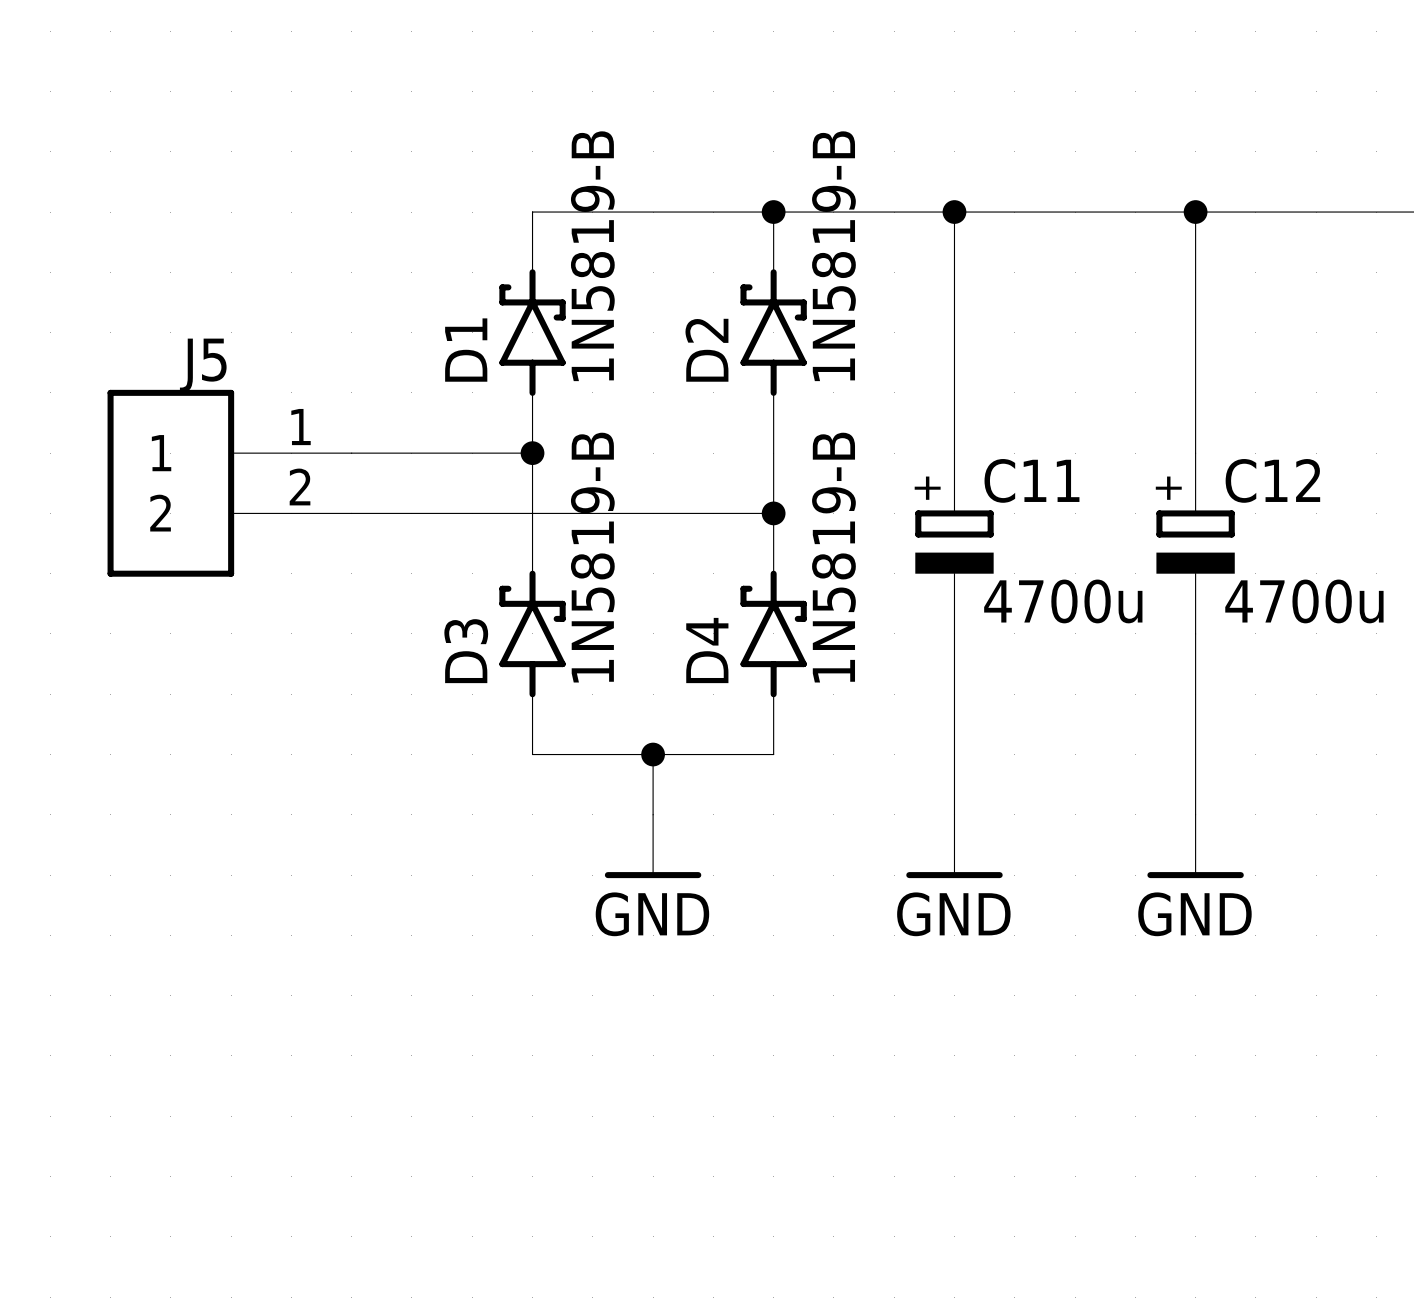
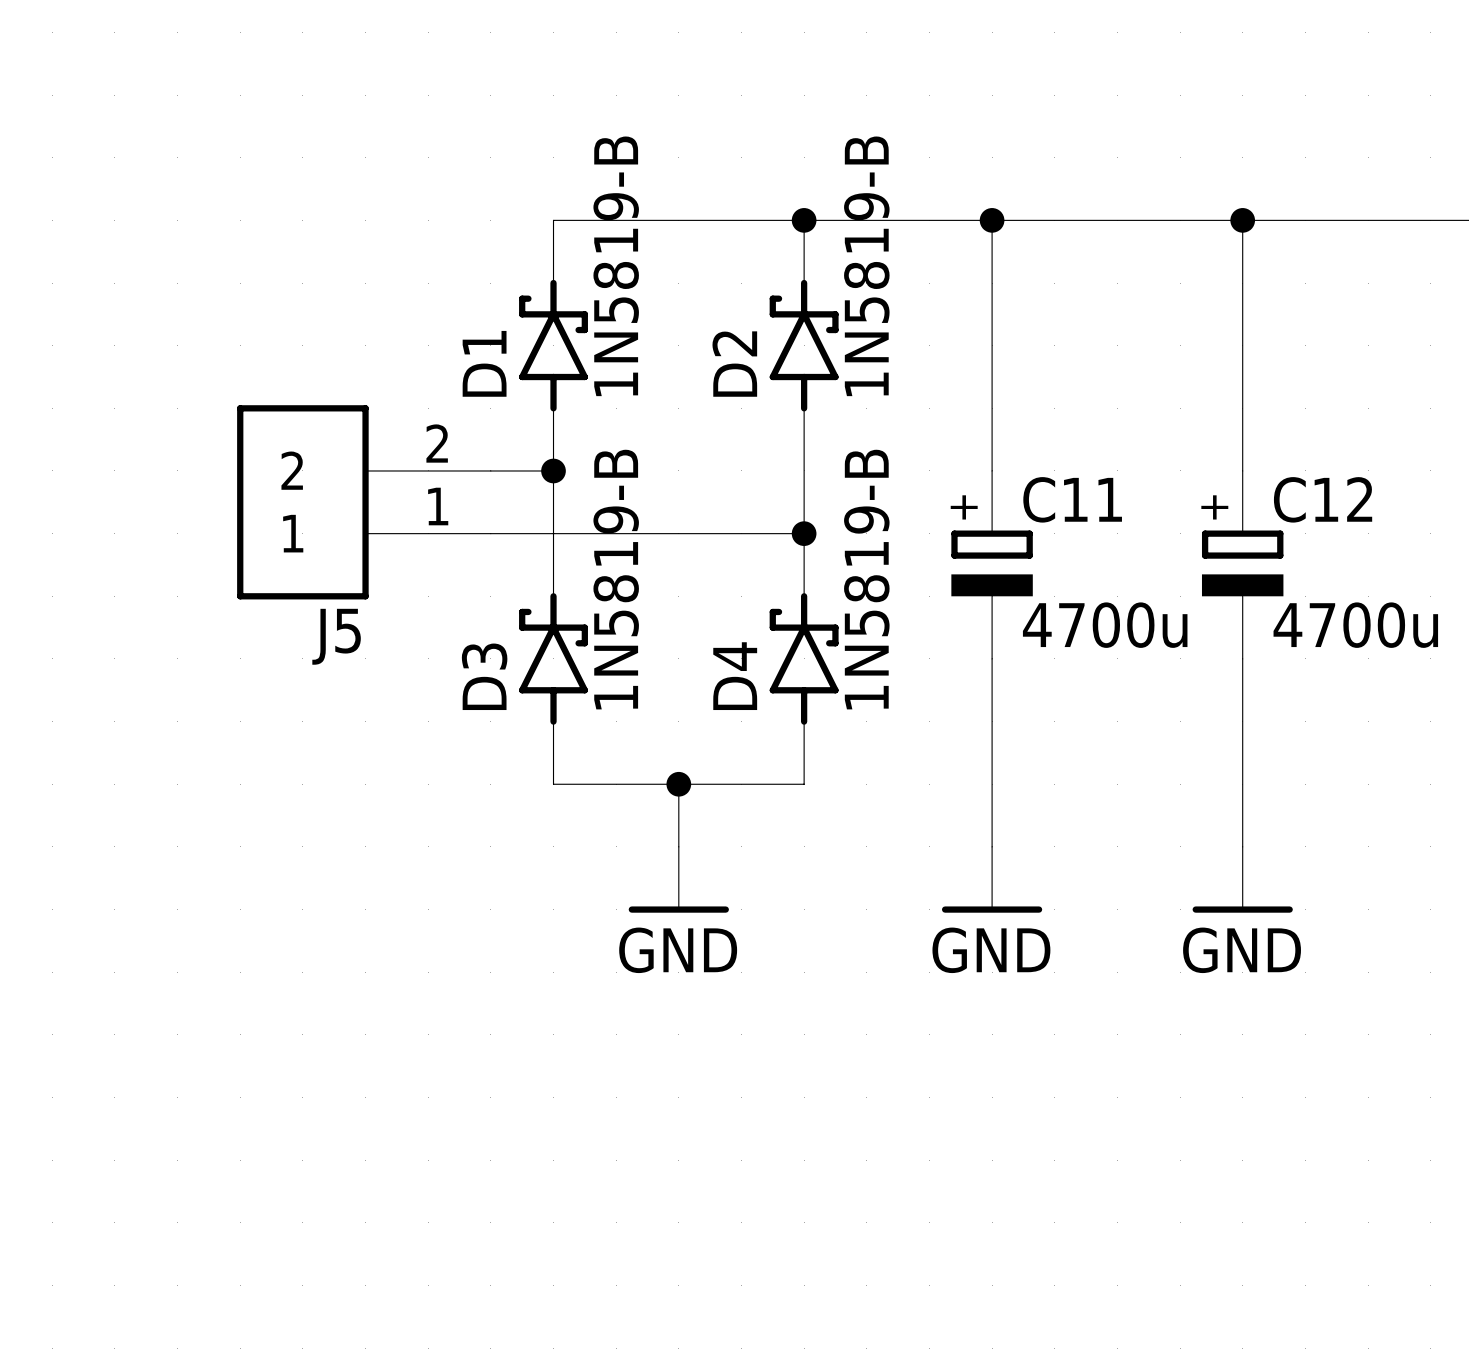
J5 flip: as is (170, 483) -> up-down (302, 502)

